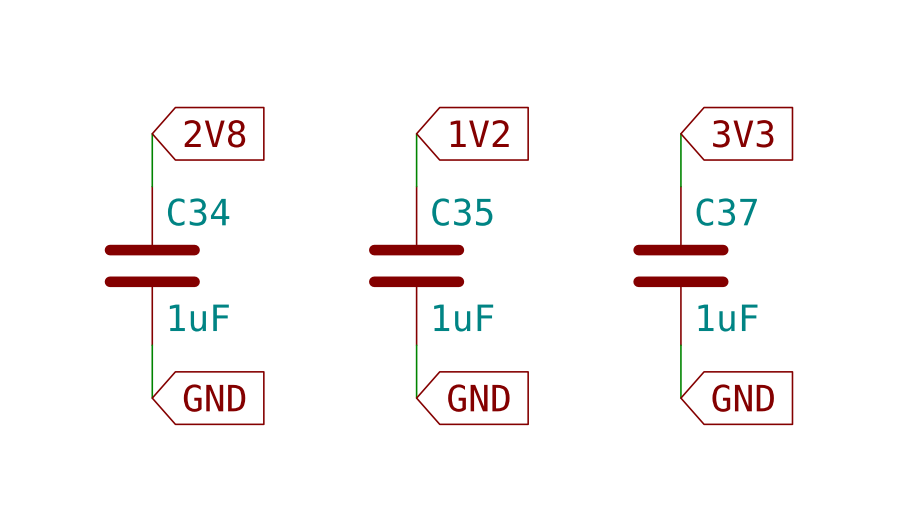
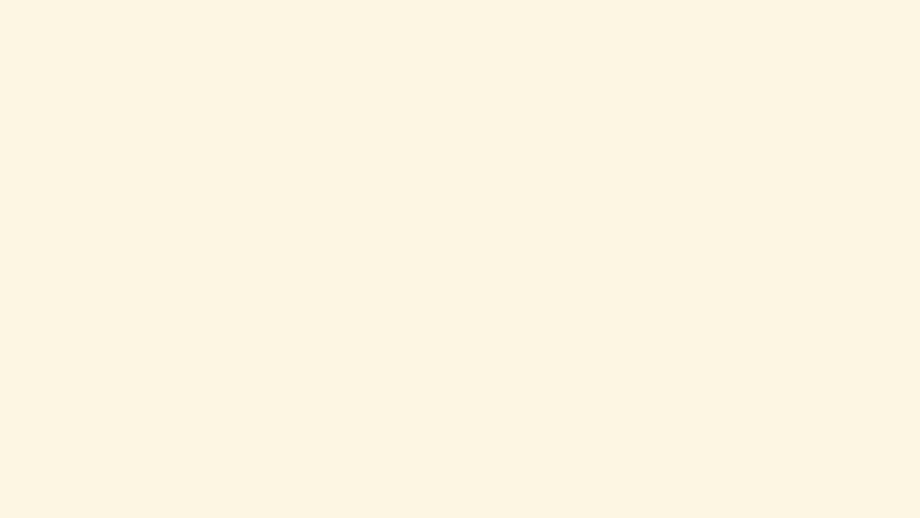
wire: (152, 133) (152, 186) -> none
global label: 2V8 (214, 133) -> none
wire: (416, 133) (416, 186) -> none
global label: 1V2 (479, 133) -> none
wire: (680, 133) (680, 186) -> none
global label: 3V3 (743, 133) -> none
C34: 1uF (152, 265) -> none
C35: 1uF (416, 265) -> none
C37: 1uF (680, 265) -> none
wire: (152, 345) (152, 398) -> none
wire: (416, 345) (416, 398) -> none
wire: (680, 345) (680, 398) -> none
global label: GND (214, 398) -> none
global label: GND (478, 398) -> none
global label: GND (743, 398) -> none

